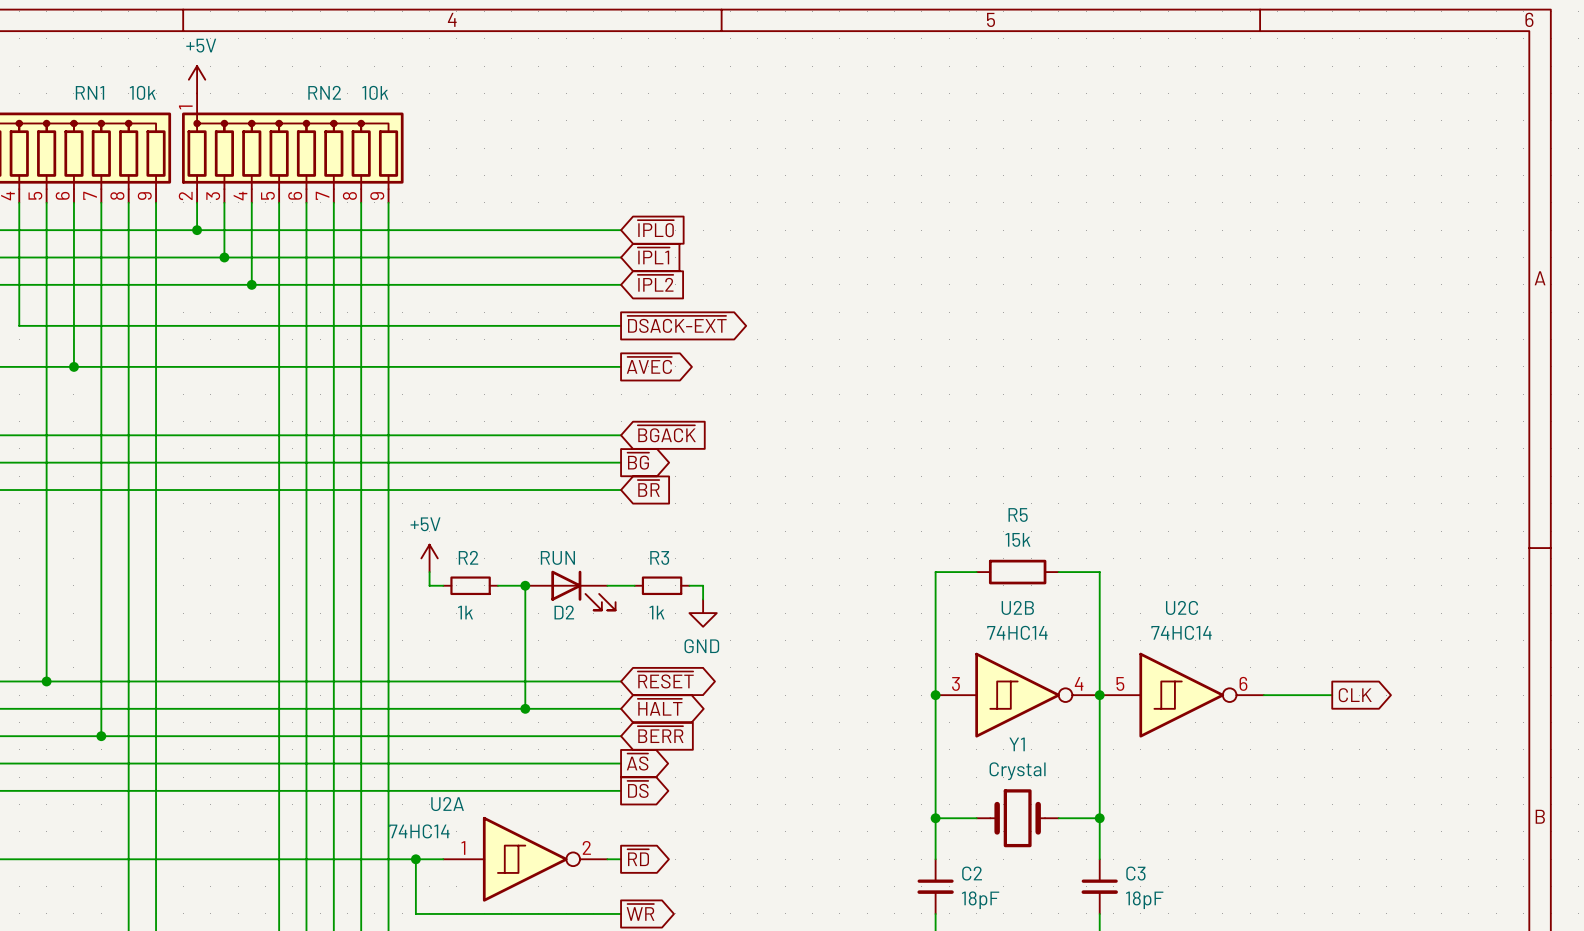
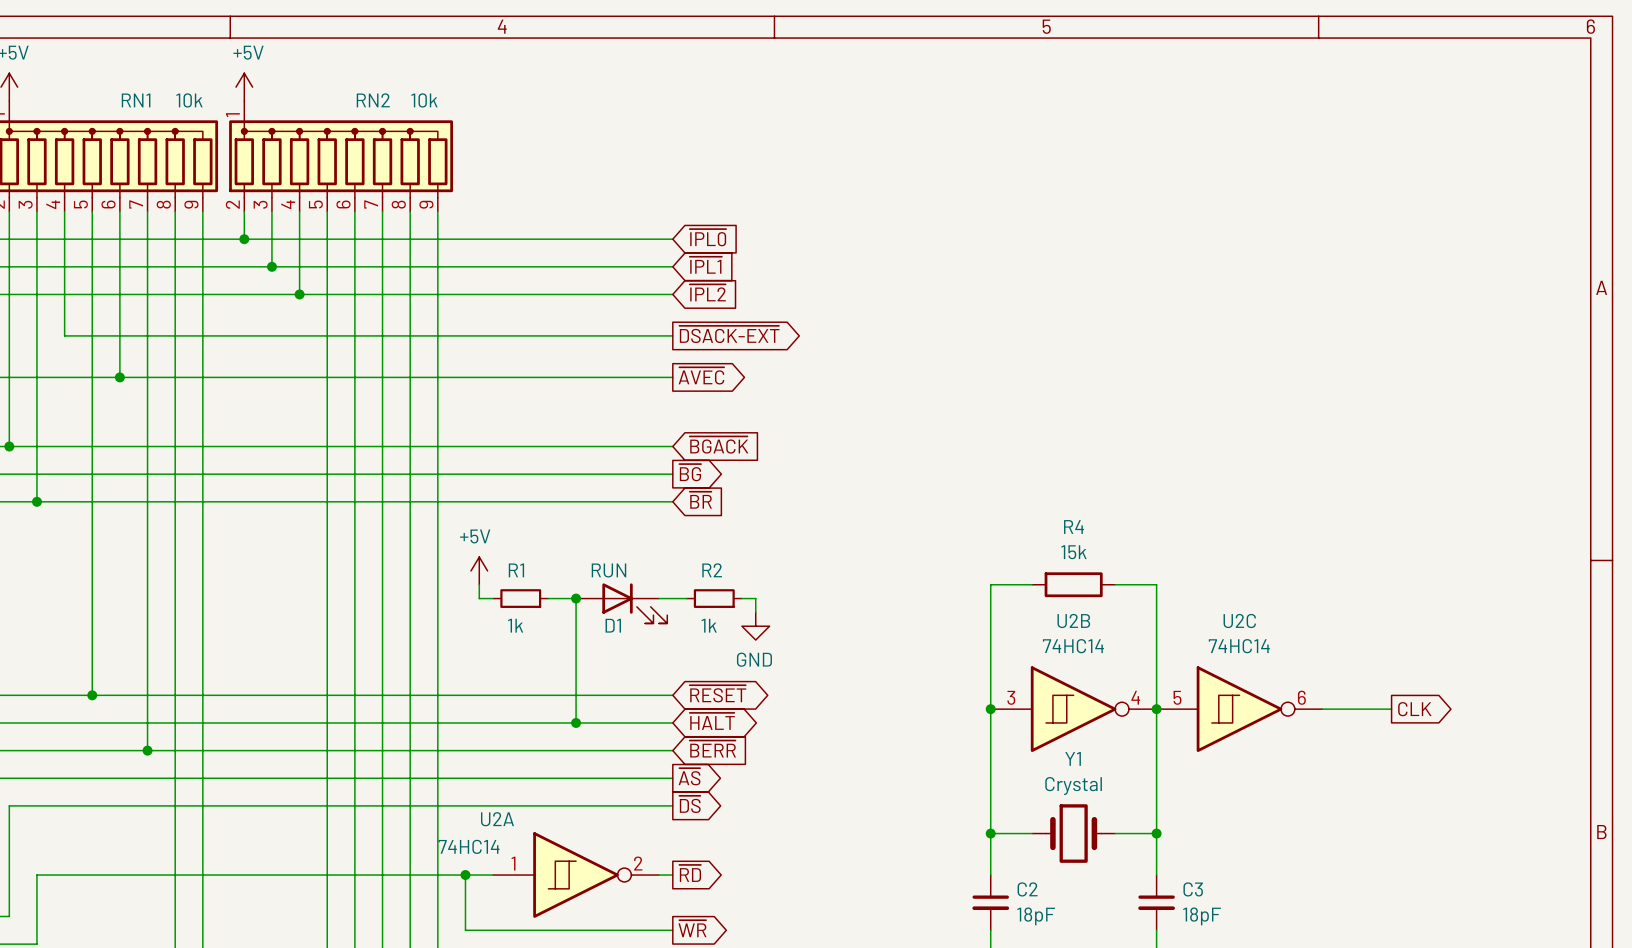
R5 name: R5 (1018, 515) -> R4 (1073, 527)
R2 name: R2 (468, 557) -> R1 (516, 570)
R3 name: R3 (659, 557) -> R2 (712, 570)
D2 name: D2 (564, 612) -> D1 (613, 625)

